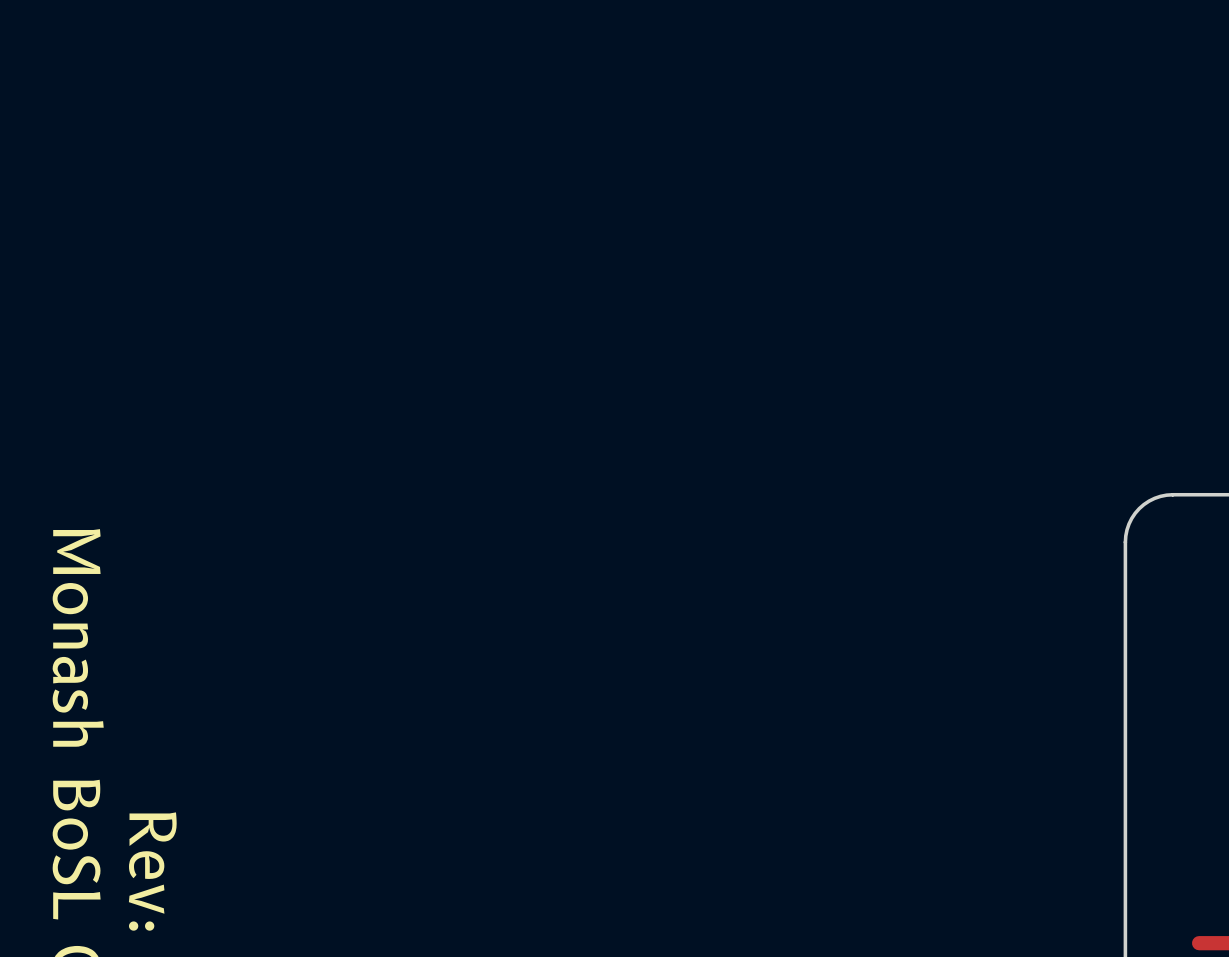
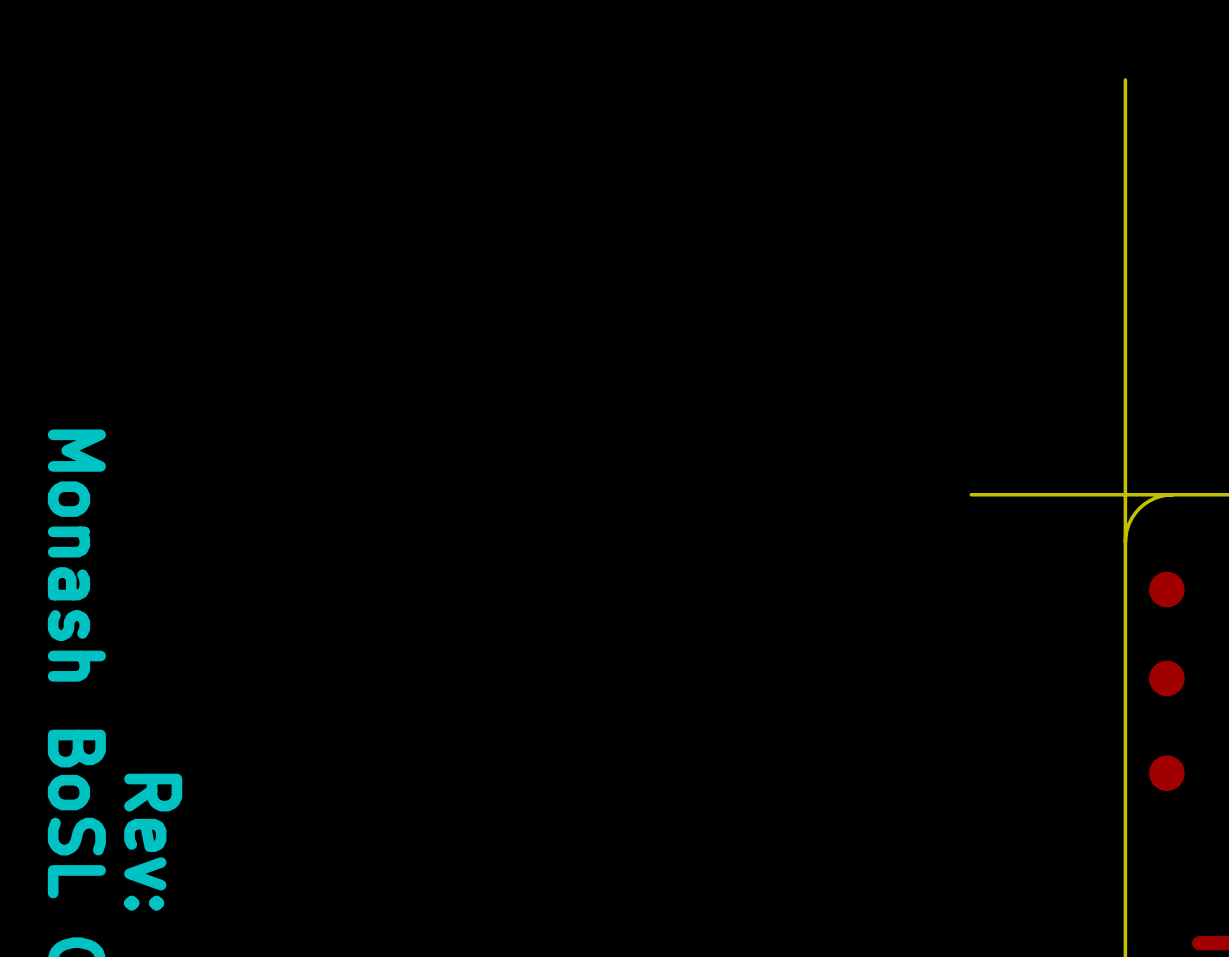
board edge: none -> (1125, 79) (1125, 542)
board edge: none -> (1172, 494) (971, 494)
part: none -> (1166, 589)
part: none -> (1166, 678)
part: none -> (1166, 773)

